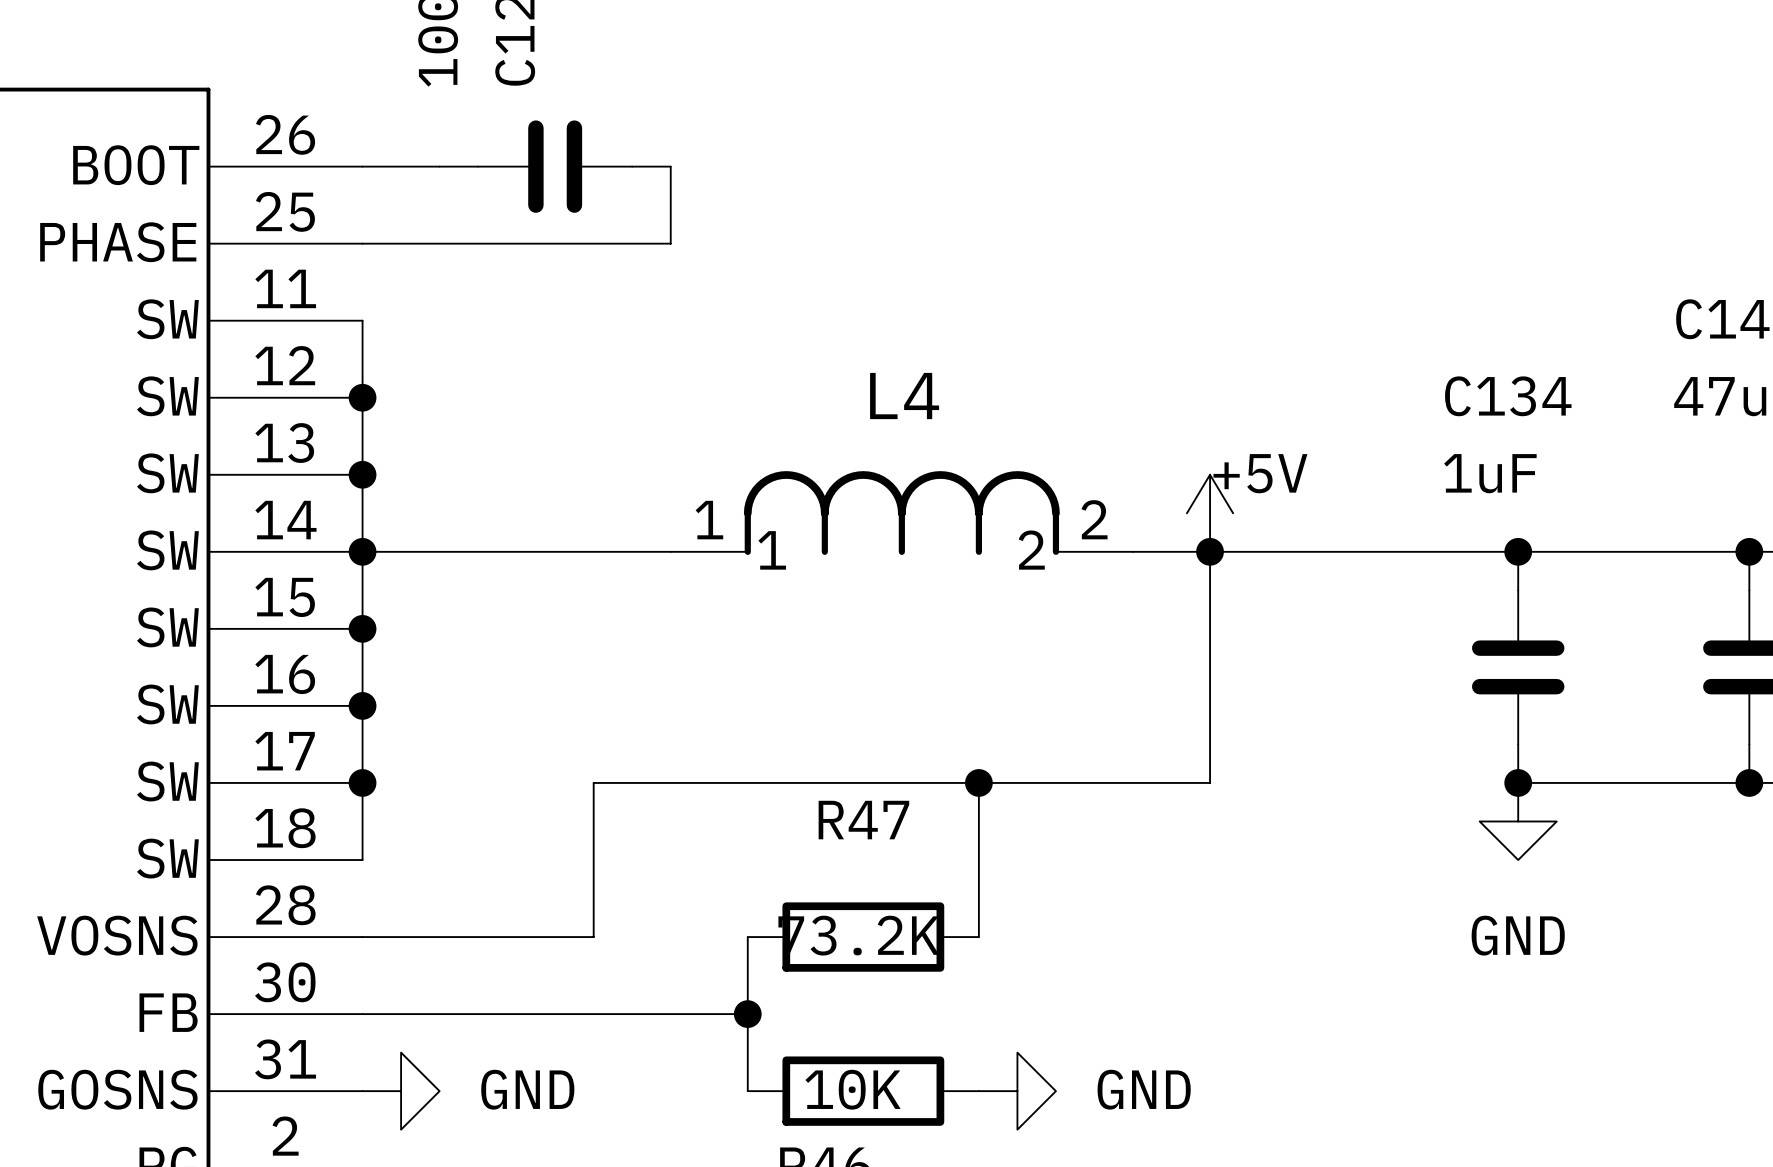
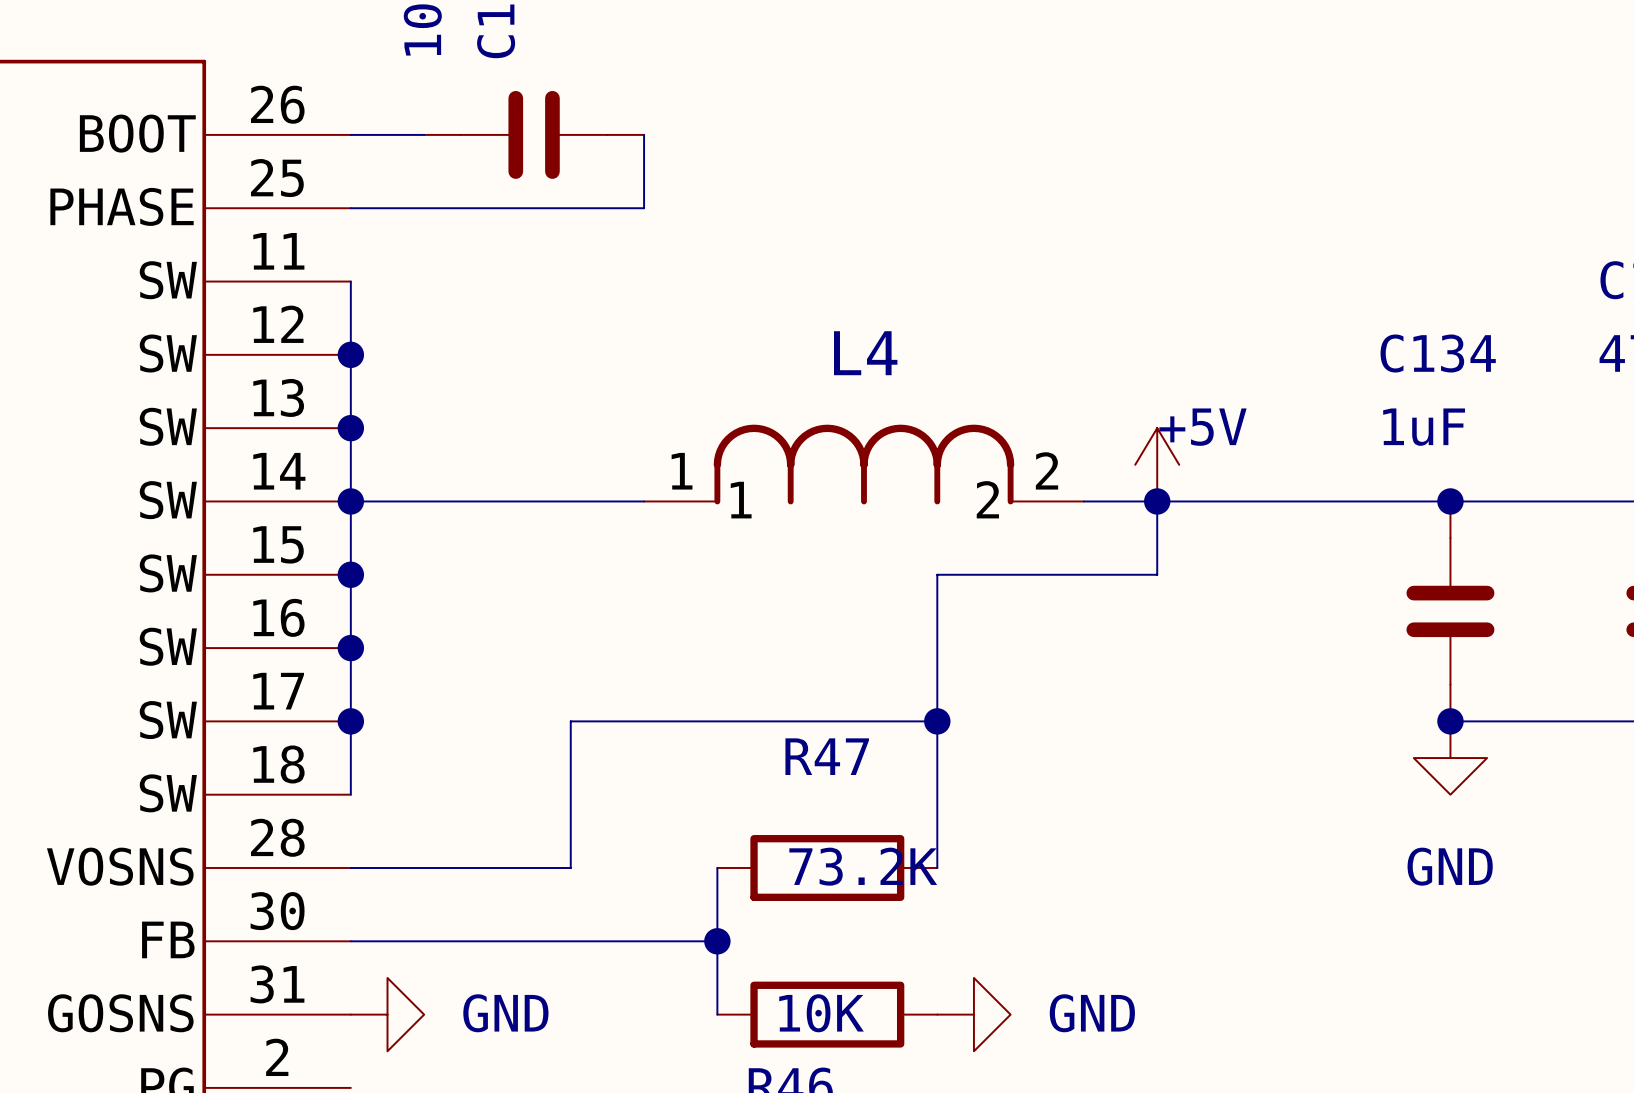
wire: (1210, 628) (1210, 782) (978, 782) -> (1157, 574) (937, 574) (937, 721)
R47 value position: 73.2K (858, 935) -> 73.2K (863, 866)

